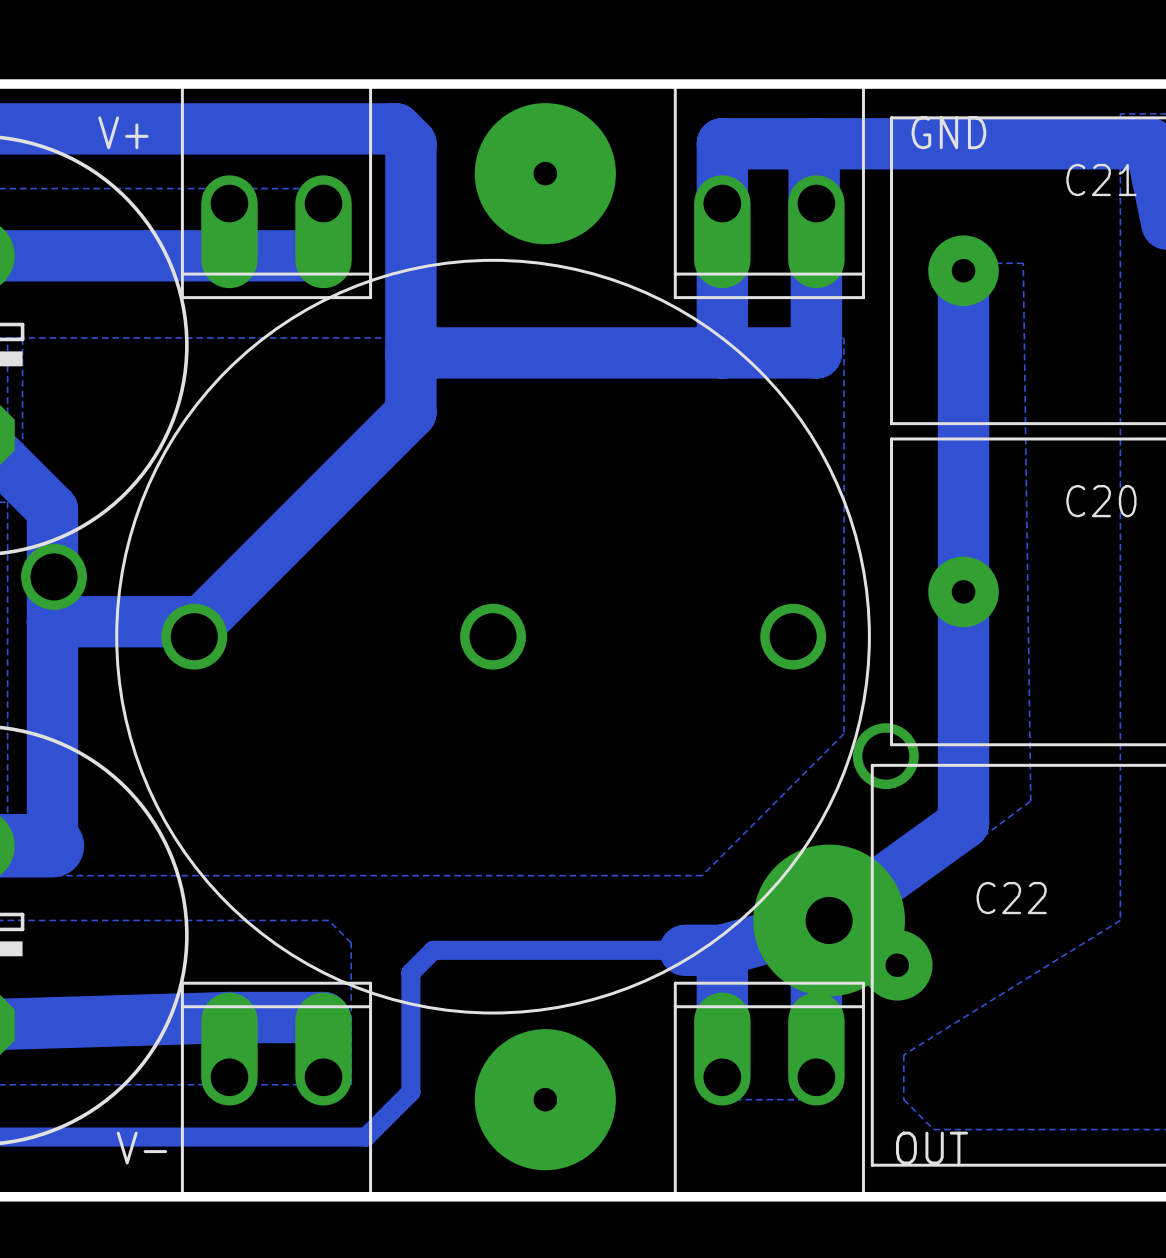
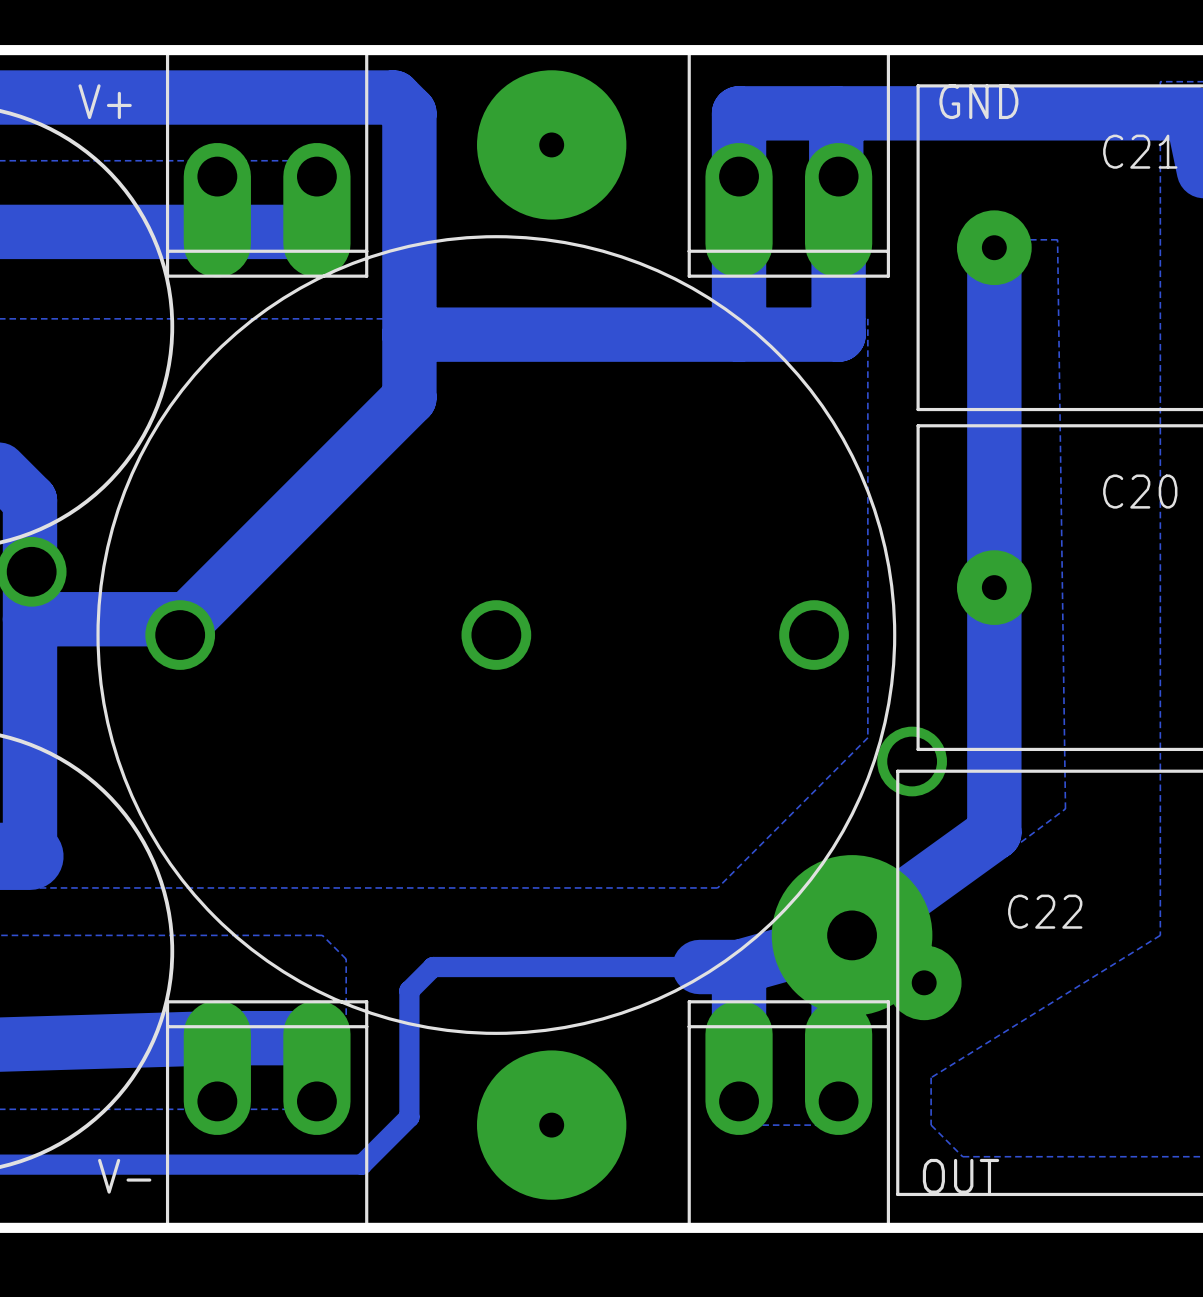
V+ footprint: [180, 84, 373, 300] -> [165, 50, 369, 278]
GND footprint: [673, 84, 865, 300] -> [687, 50, 890, 278]
V- footprint: [180, 981, 373, 1197] -> [165, 1000, 369, 1228]
OUT footprint: [673, 981, 865, 1197] -> [687, 1000, 890, 1228]

